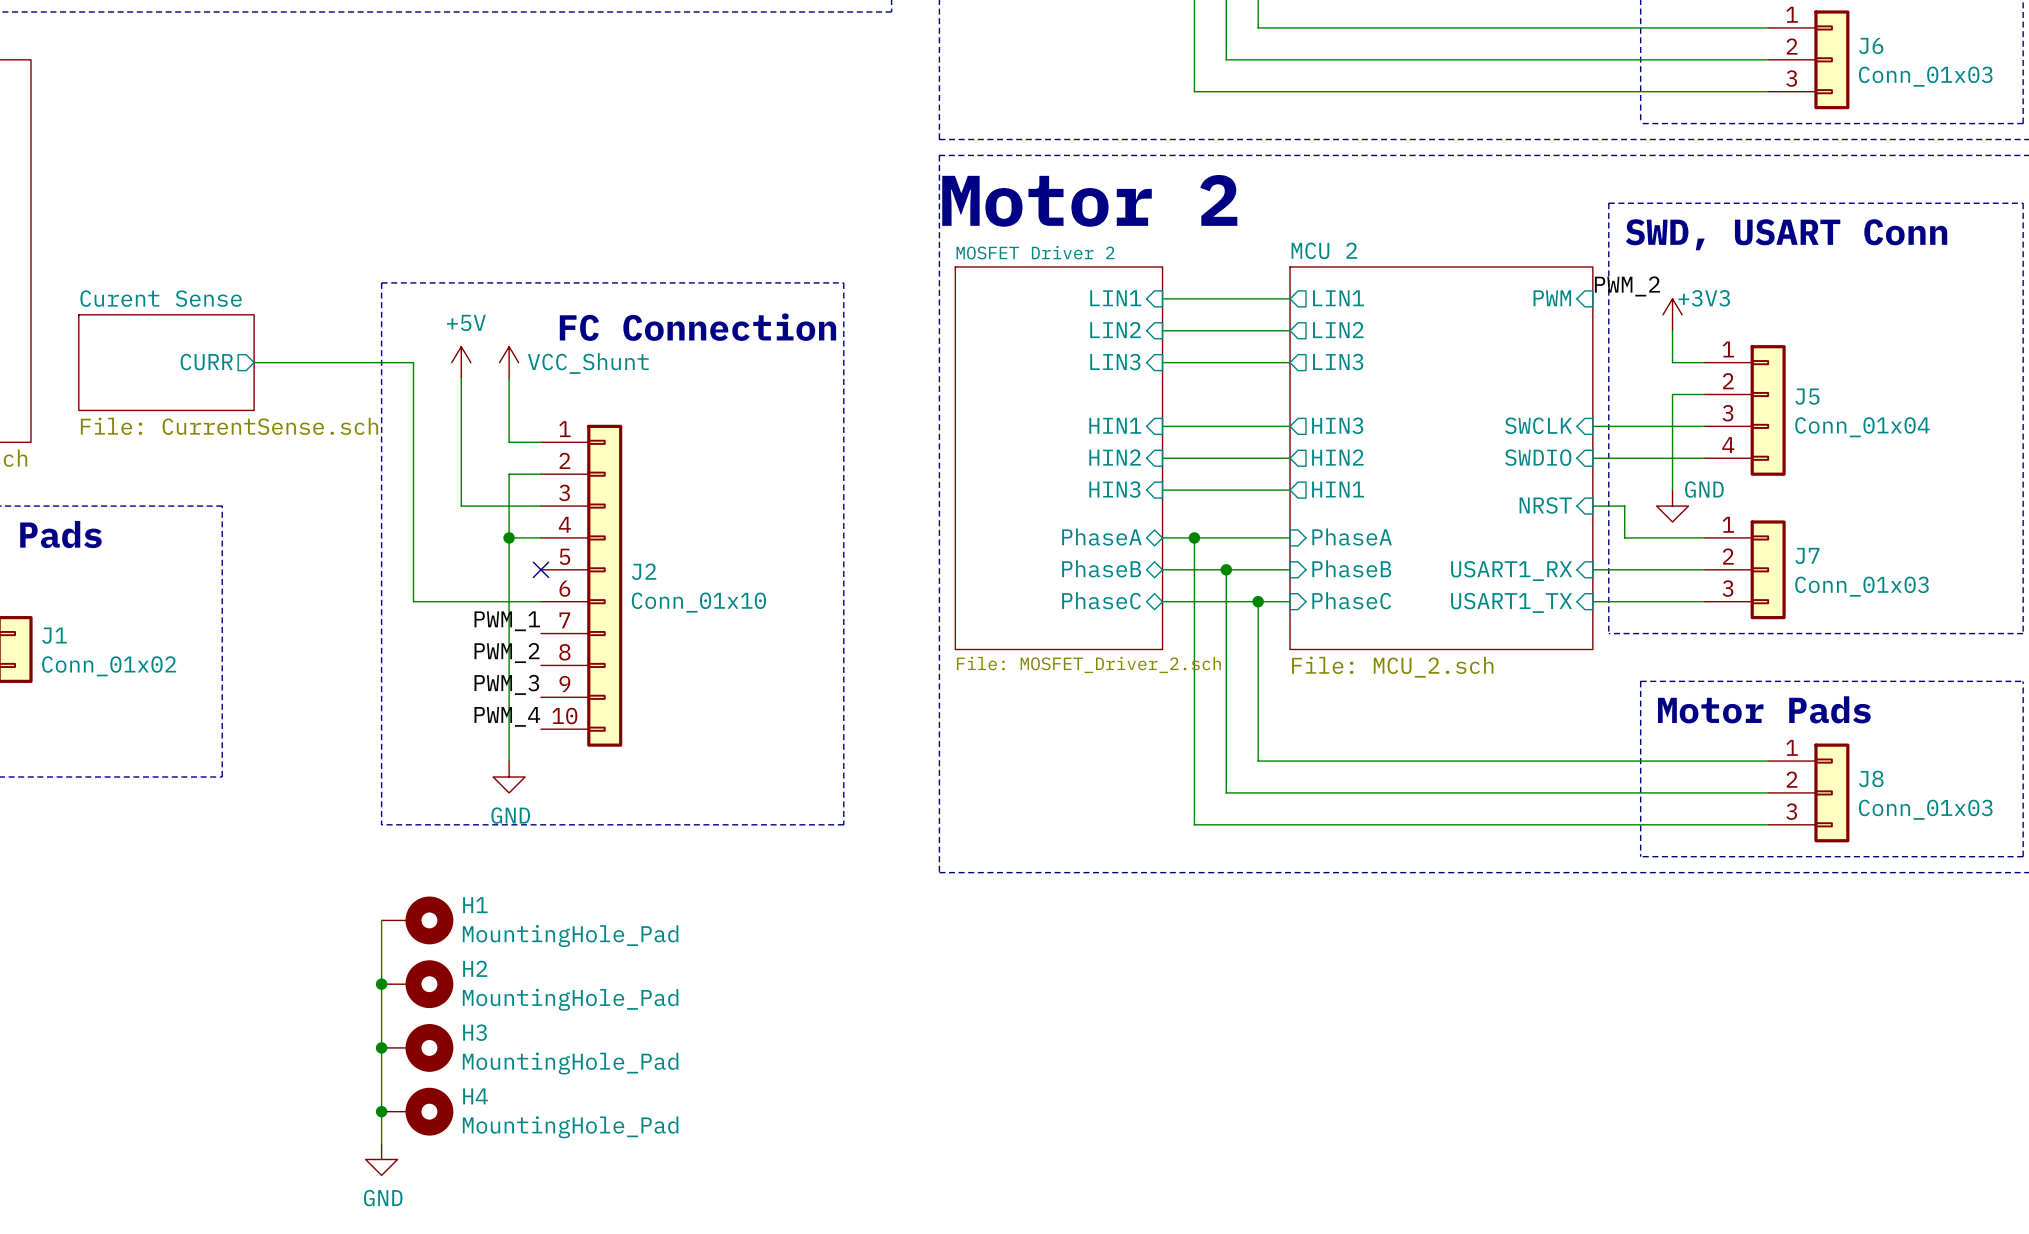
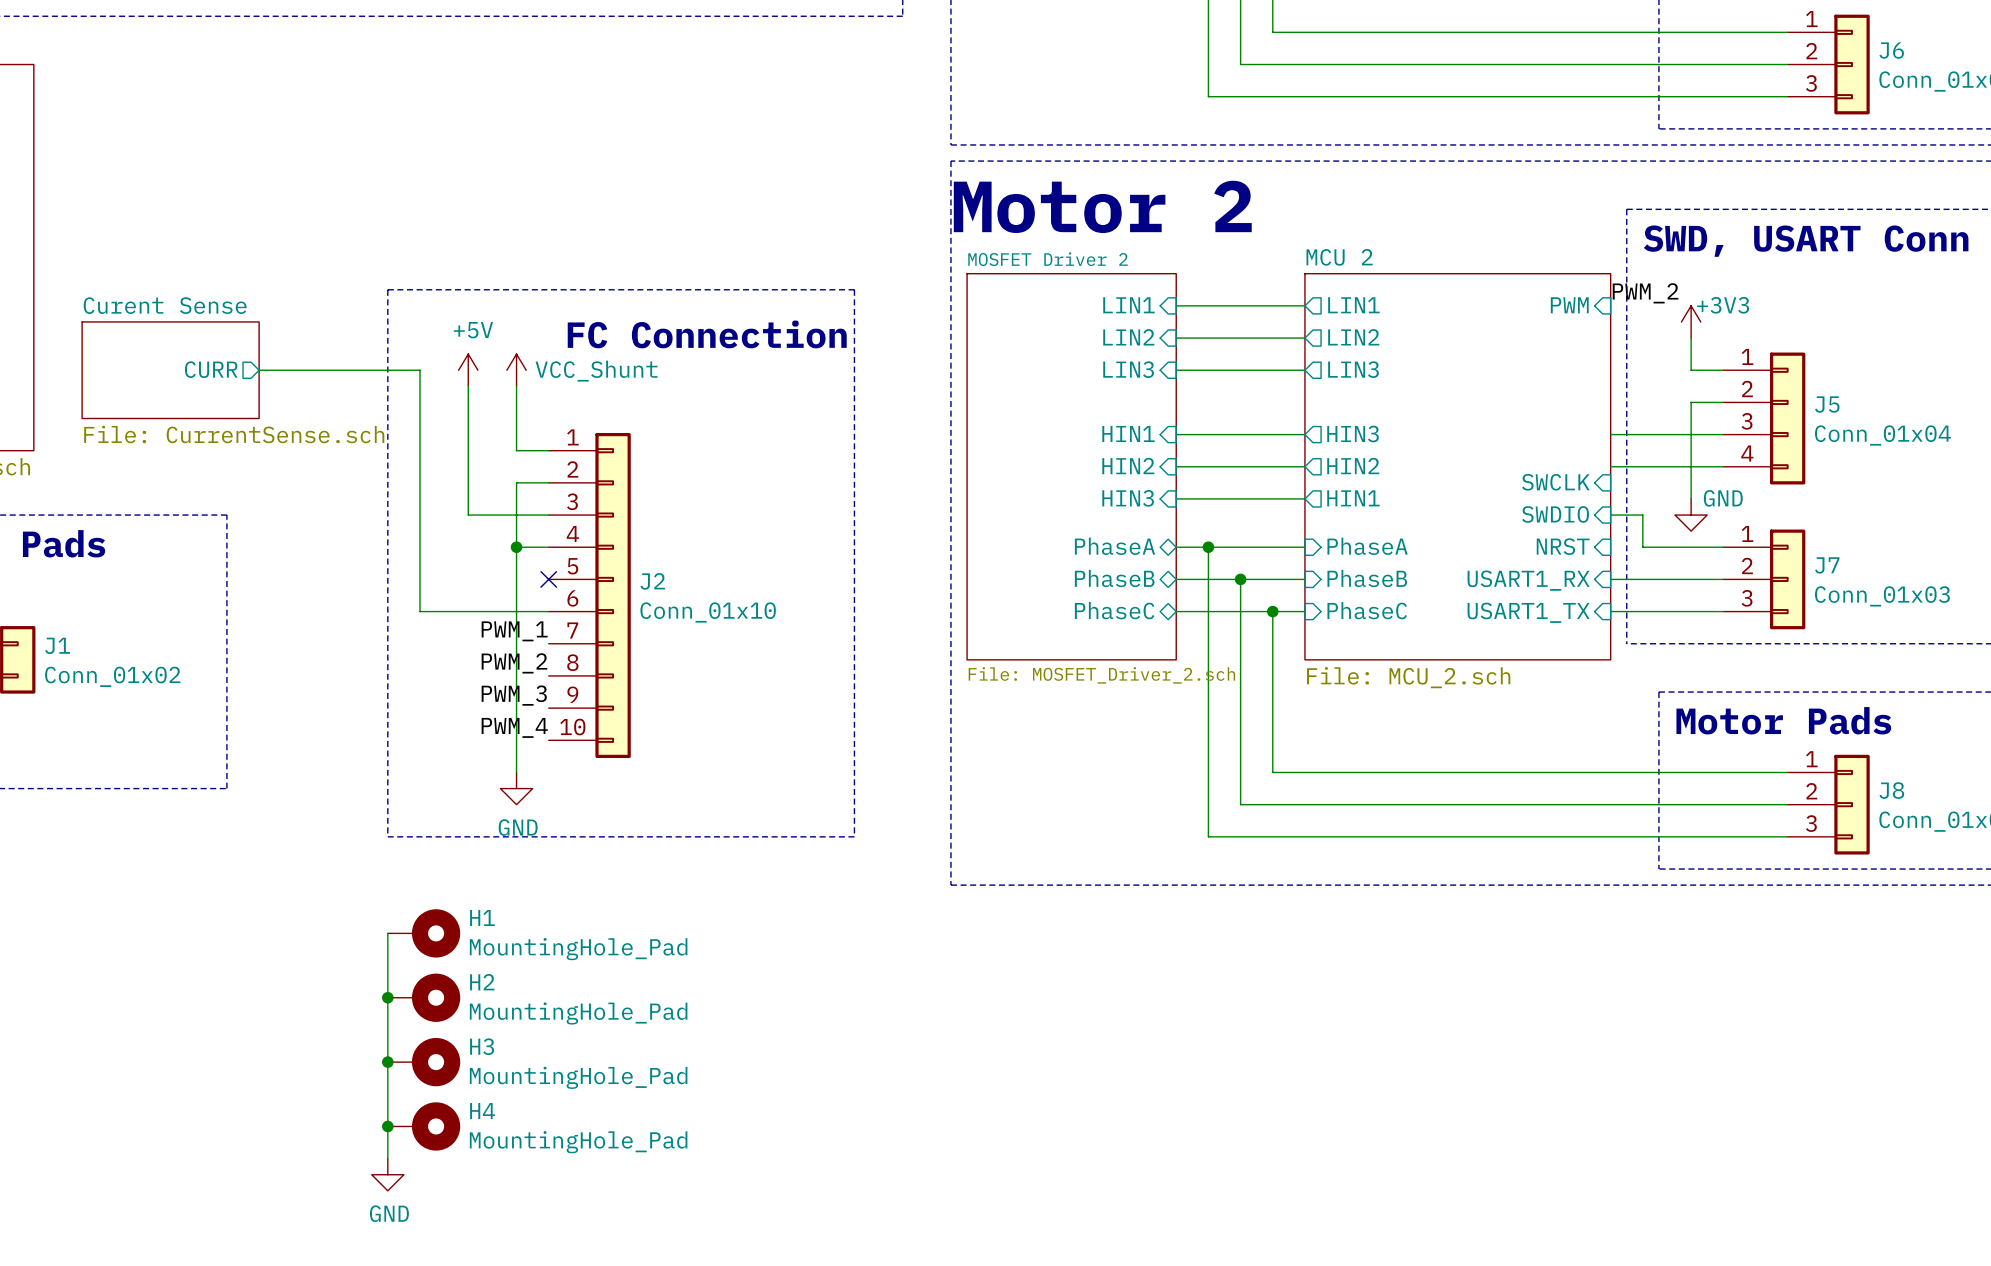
sheet pin position: SWCLK (1538, 425) -> SWCLK (1555, 482)
sheet pin: SWDIO (1538, 457) -> none
sheet pin: NRST (1545, 505) -> SWDIO (1555, 514)
sheet pin: none -> NRST (1563, 546)

